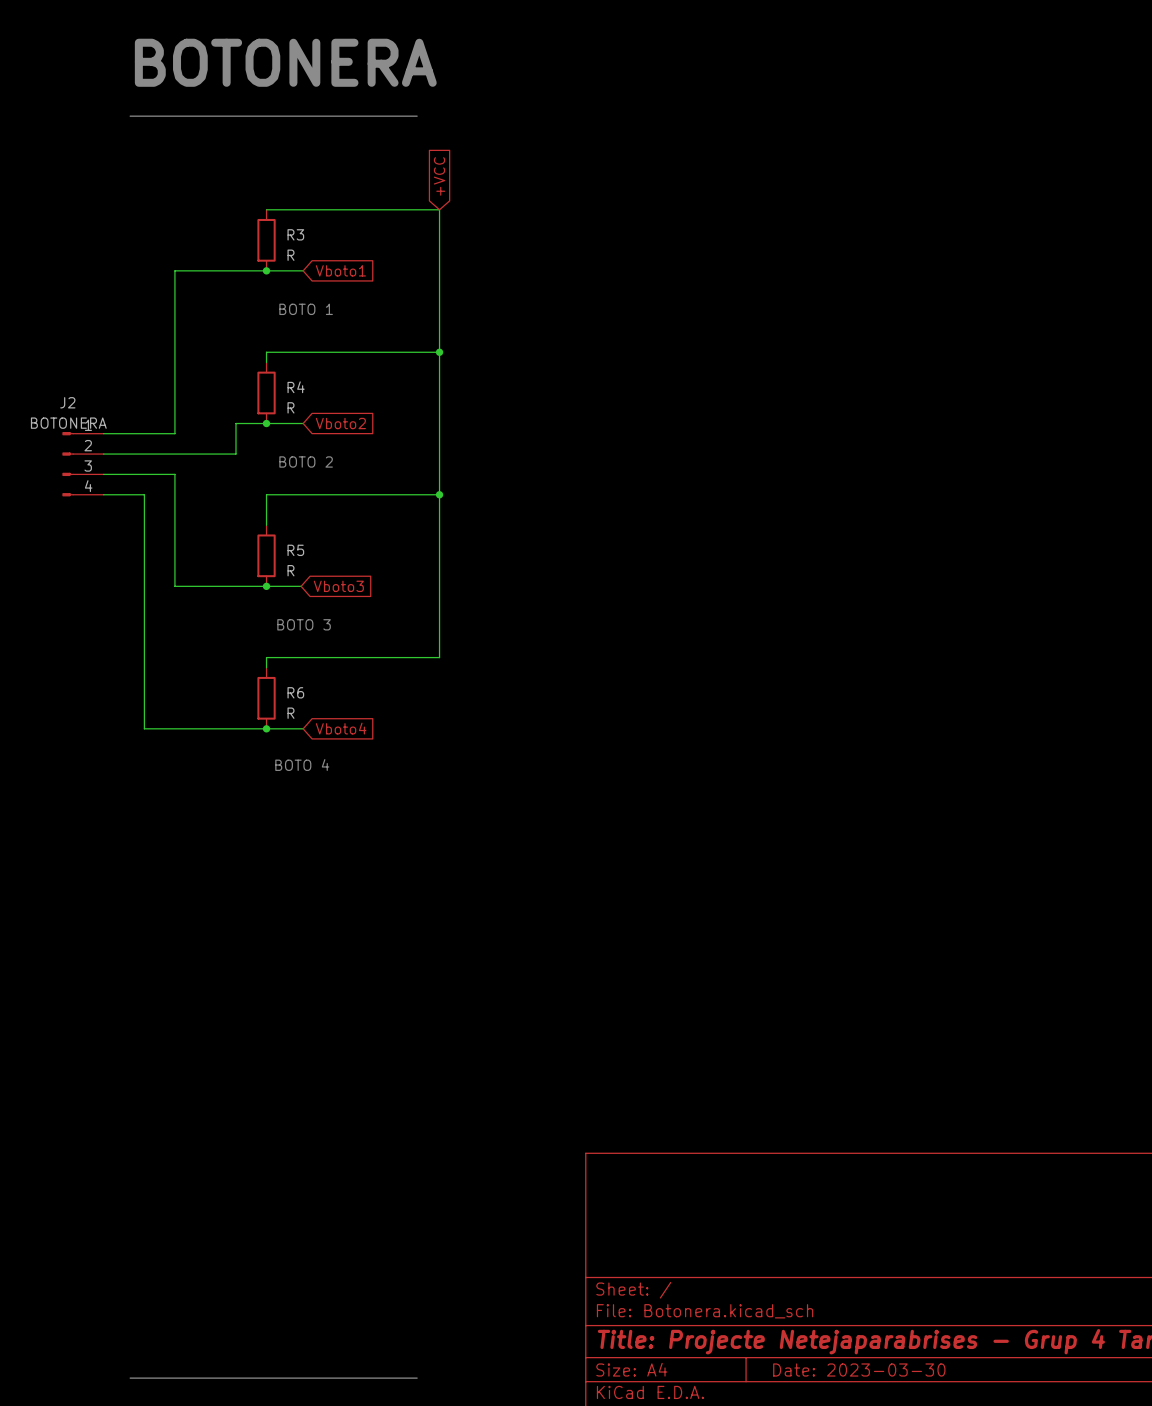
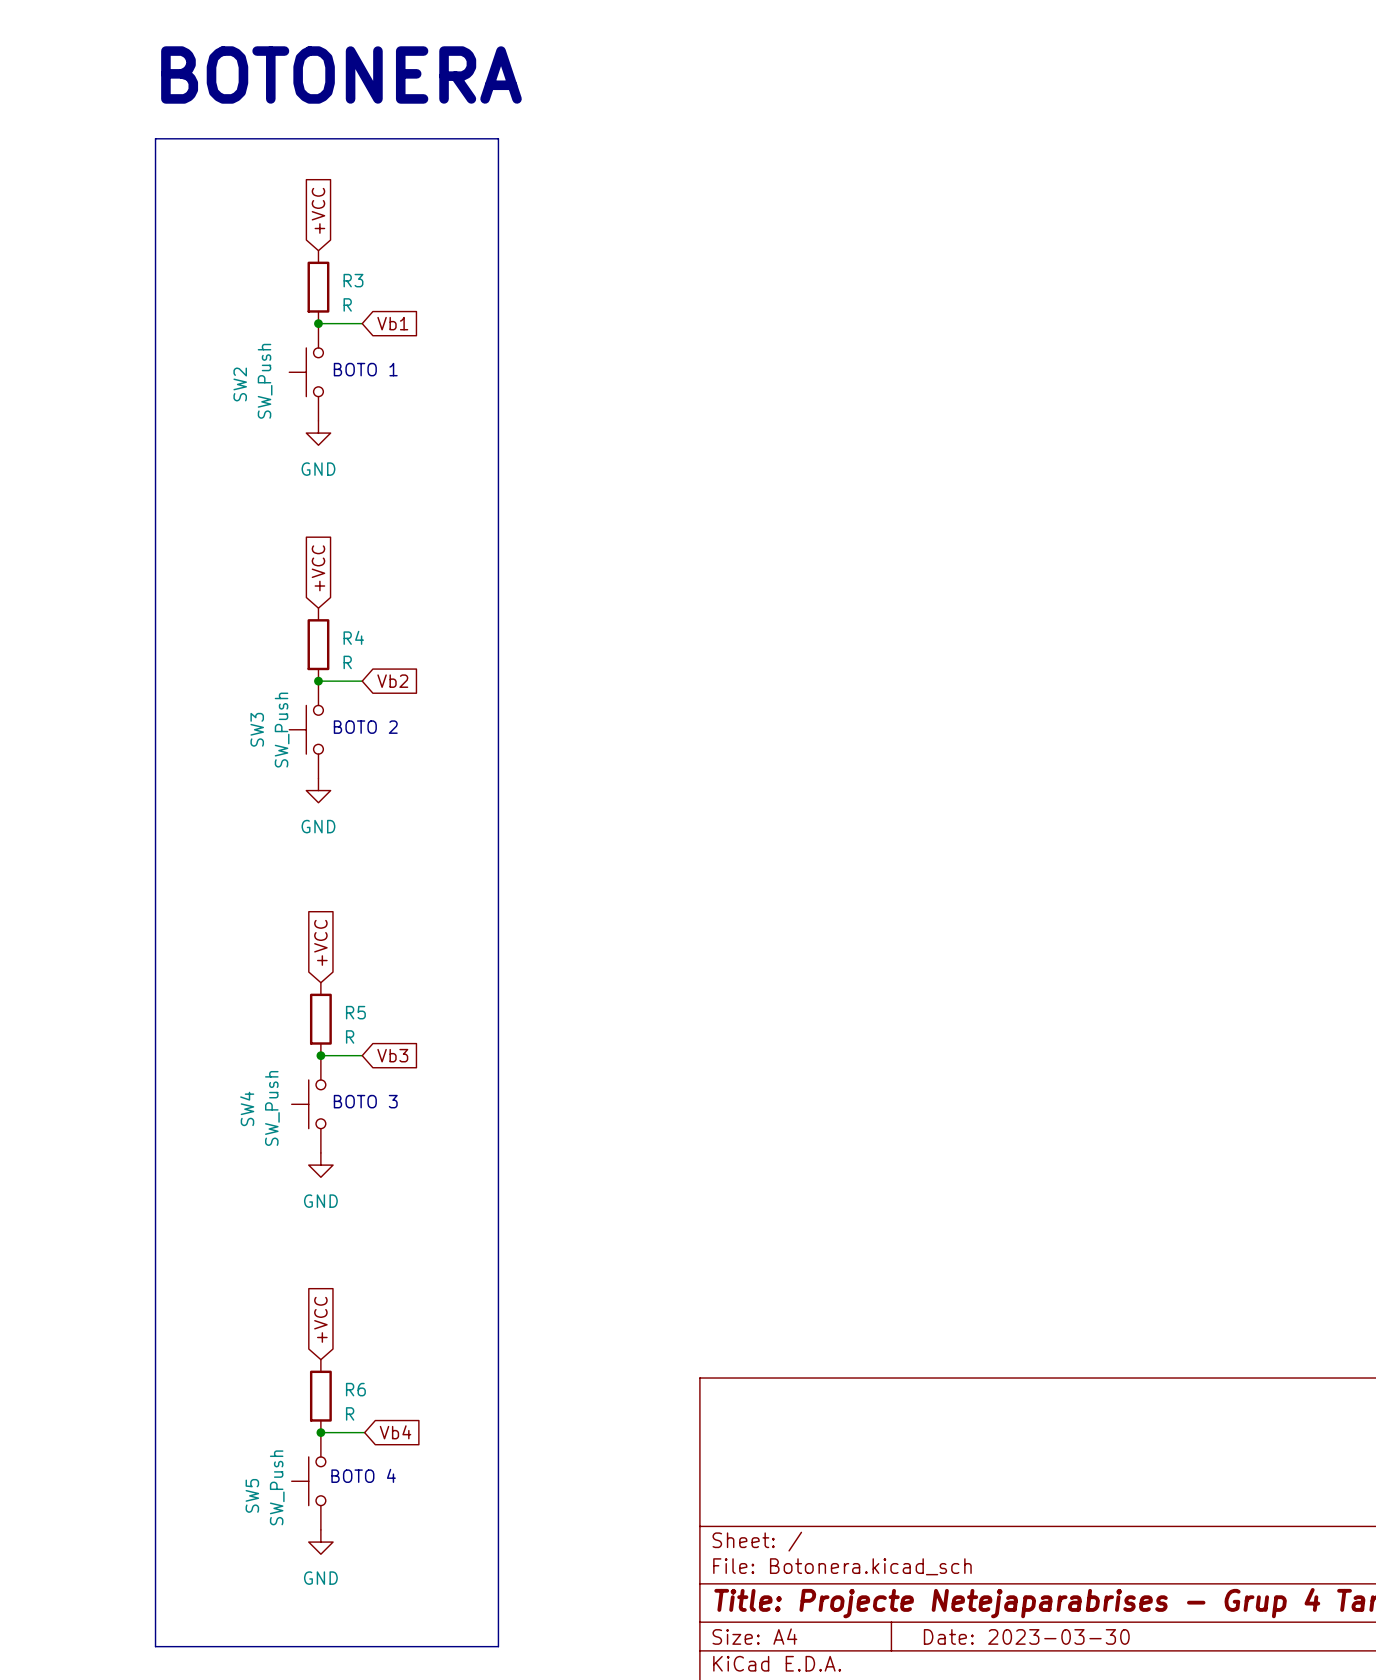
line: none -> (155, 138) (155, 1646)
line: none -> (498, 138) (498, 1646)
global label: none -> +VCC (318, 210)
global label: +VCC (439, 176) -> none
wire: (266, 209) (439, 209) (439, 657) (266, 657) (266, 667) -> none
wire: (266, 270) (174, 270) (174, 433) (103, 433) -> none
global label: Vboto1 (340, 270) -> Vb1 (392, 323)
SW2: none -> SW_Push (306, 372)
wire: (439, 352) (266, 352) (266, 362) -> none
junction: (439, 352) -> none
power symbol: none -> GND (318, 433)
R4 position: (266, 392) -> (318, 644)
junction: (266, 423) -> none
wire: (303, 423) (236, 423) (236, 454) (103, 454) -> none
global label: Vboto2 (340, 423) -> none
text position: BOTO 2 (306, 461) -> BOTO 2 (365, 727)
J2: BOTONERA (83, 464) -> none
wire: (103, 474) (174, 474) (174, 586) (301, 586) -> none
global label: none -> +VCC (318, 568)
wire: (103, 494) (144, 494) (144, 728) (303, 728) -> none
wire: (439, 494) (266, 494) (266, 525) -> none
junction: (439, 494) -> none
R5 position: (266, 555) -> (320, 1019)
wire: none -> (318, 681) (362, 681)
global label: none -> Vb2 (392, 681)
junction position: (266, 586) -> (318, 681)
global label: Vboto3 (338, 586) -> none
SW3: none -> SW_Push (306, 729)
text: BOTO 3 (304, 624) -> none
power symbol: none -> GND (318, 790)
R6 position: (266, 698) -> (320, 1396)
junction: (266, 728) -> none
global label: Vboto4 (341, 728) -> none
text: BOTO 4 (302, 765) -> none
global label: none -> +VCC (320, 942)
wire: none -> (320, 1055) (362, 1055)
junction: none -> (320, 1055)
global label: none -> Vb3 (392, 1055)
text: none -> BOTO 3 (365, 1101)
SW4: none -> SW_Push (308, 1104)
power symbol: none -> GND (320, 1165)
global label: none -> +VCC (320, 1319)
global label: none -> Vb4 (395, 1432)
wire: none -> (320, 1432) (364, 1432)
junction: none -> (320, 1432)
text: none -> BOTO 4 (363, 1475)
SW5: none -> SW_Push (308, 1481)
power symbol: none -> GND (320, 1542)

